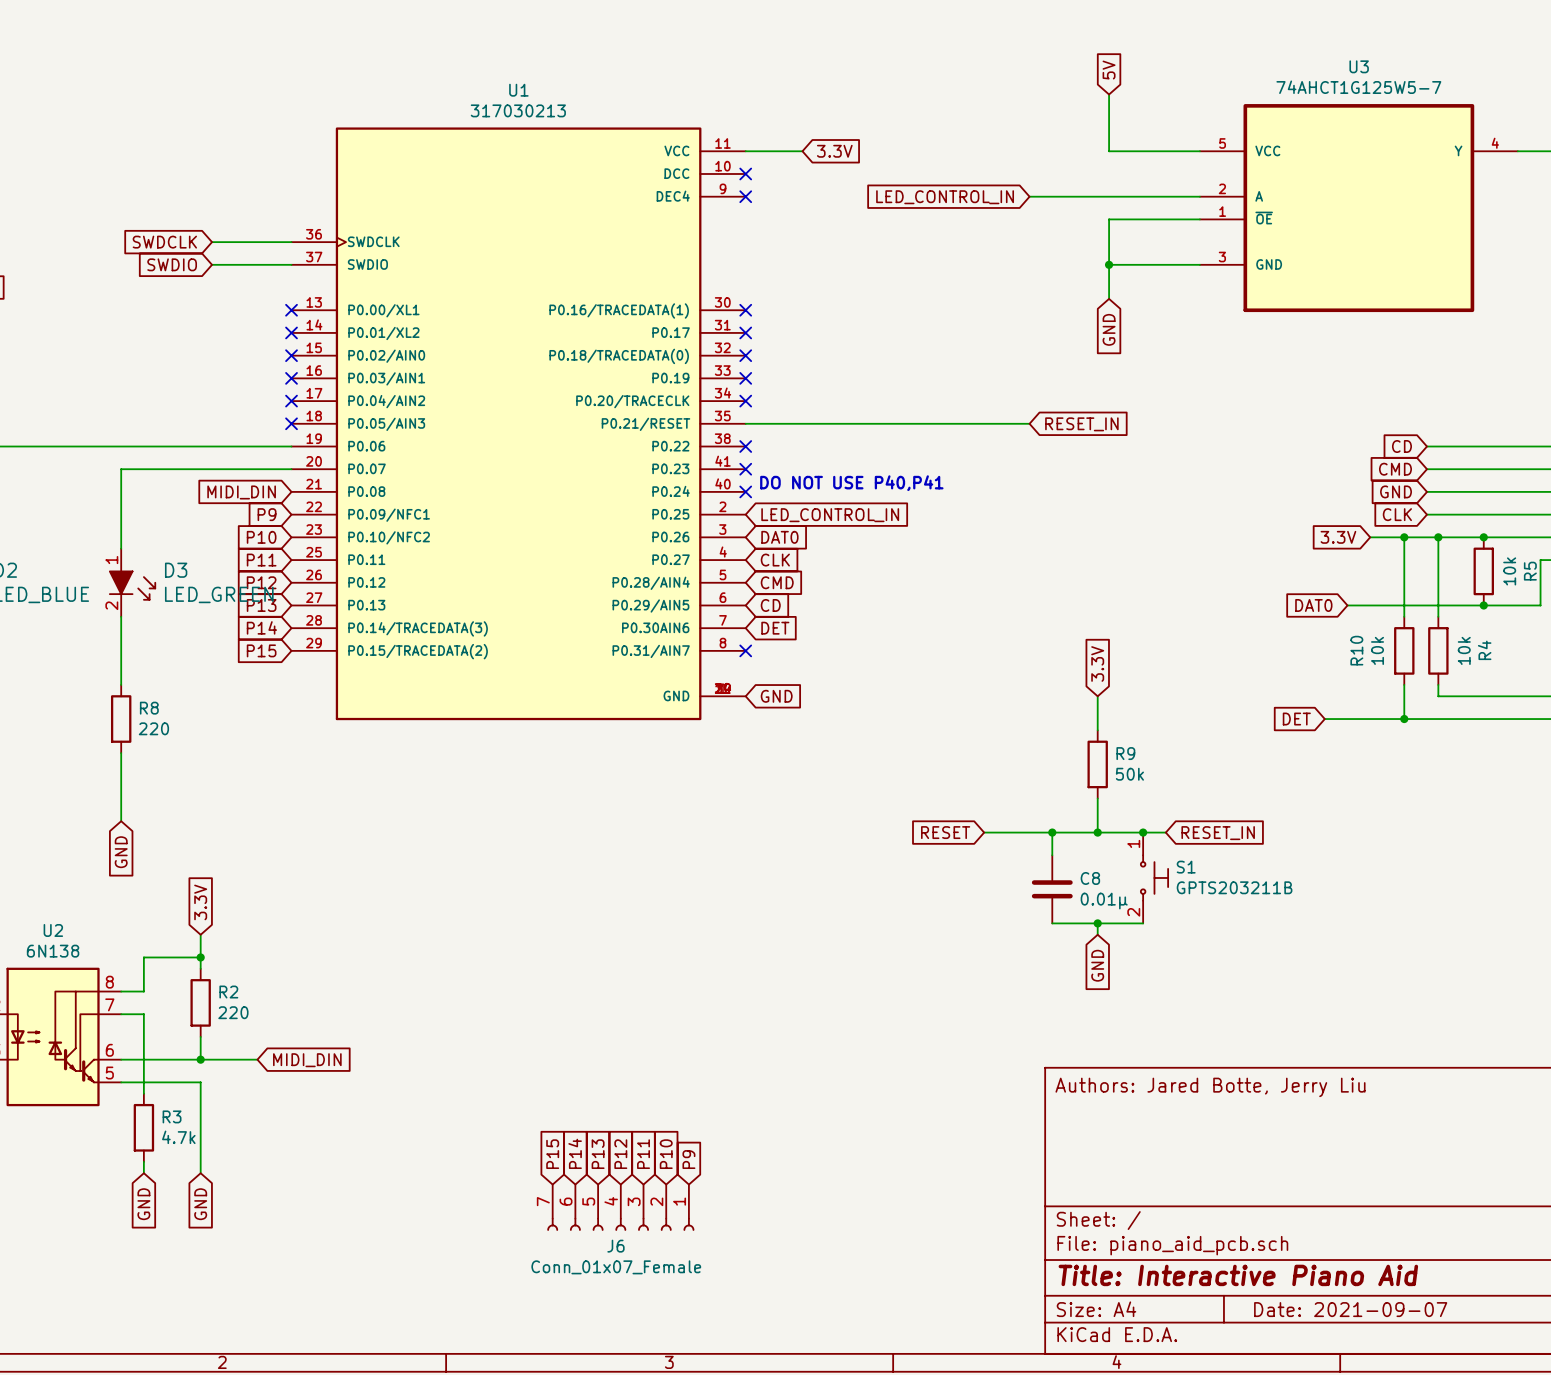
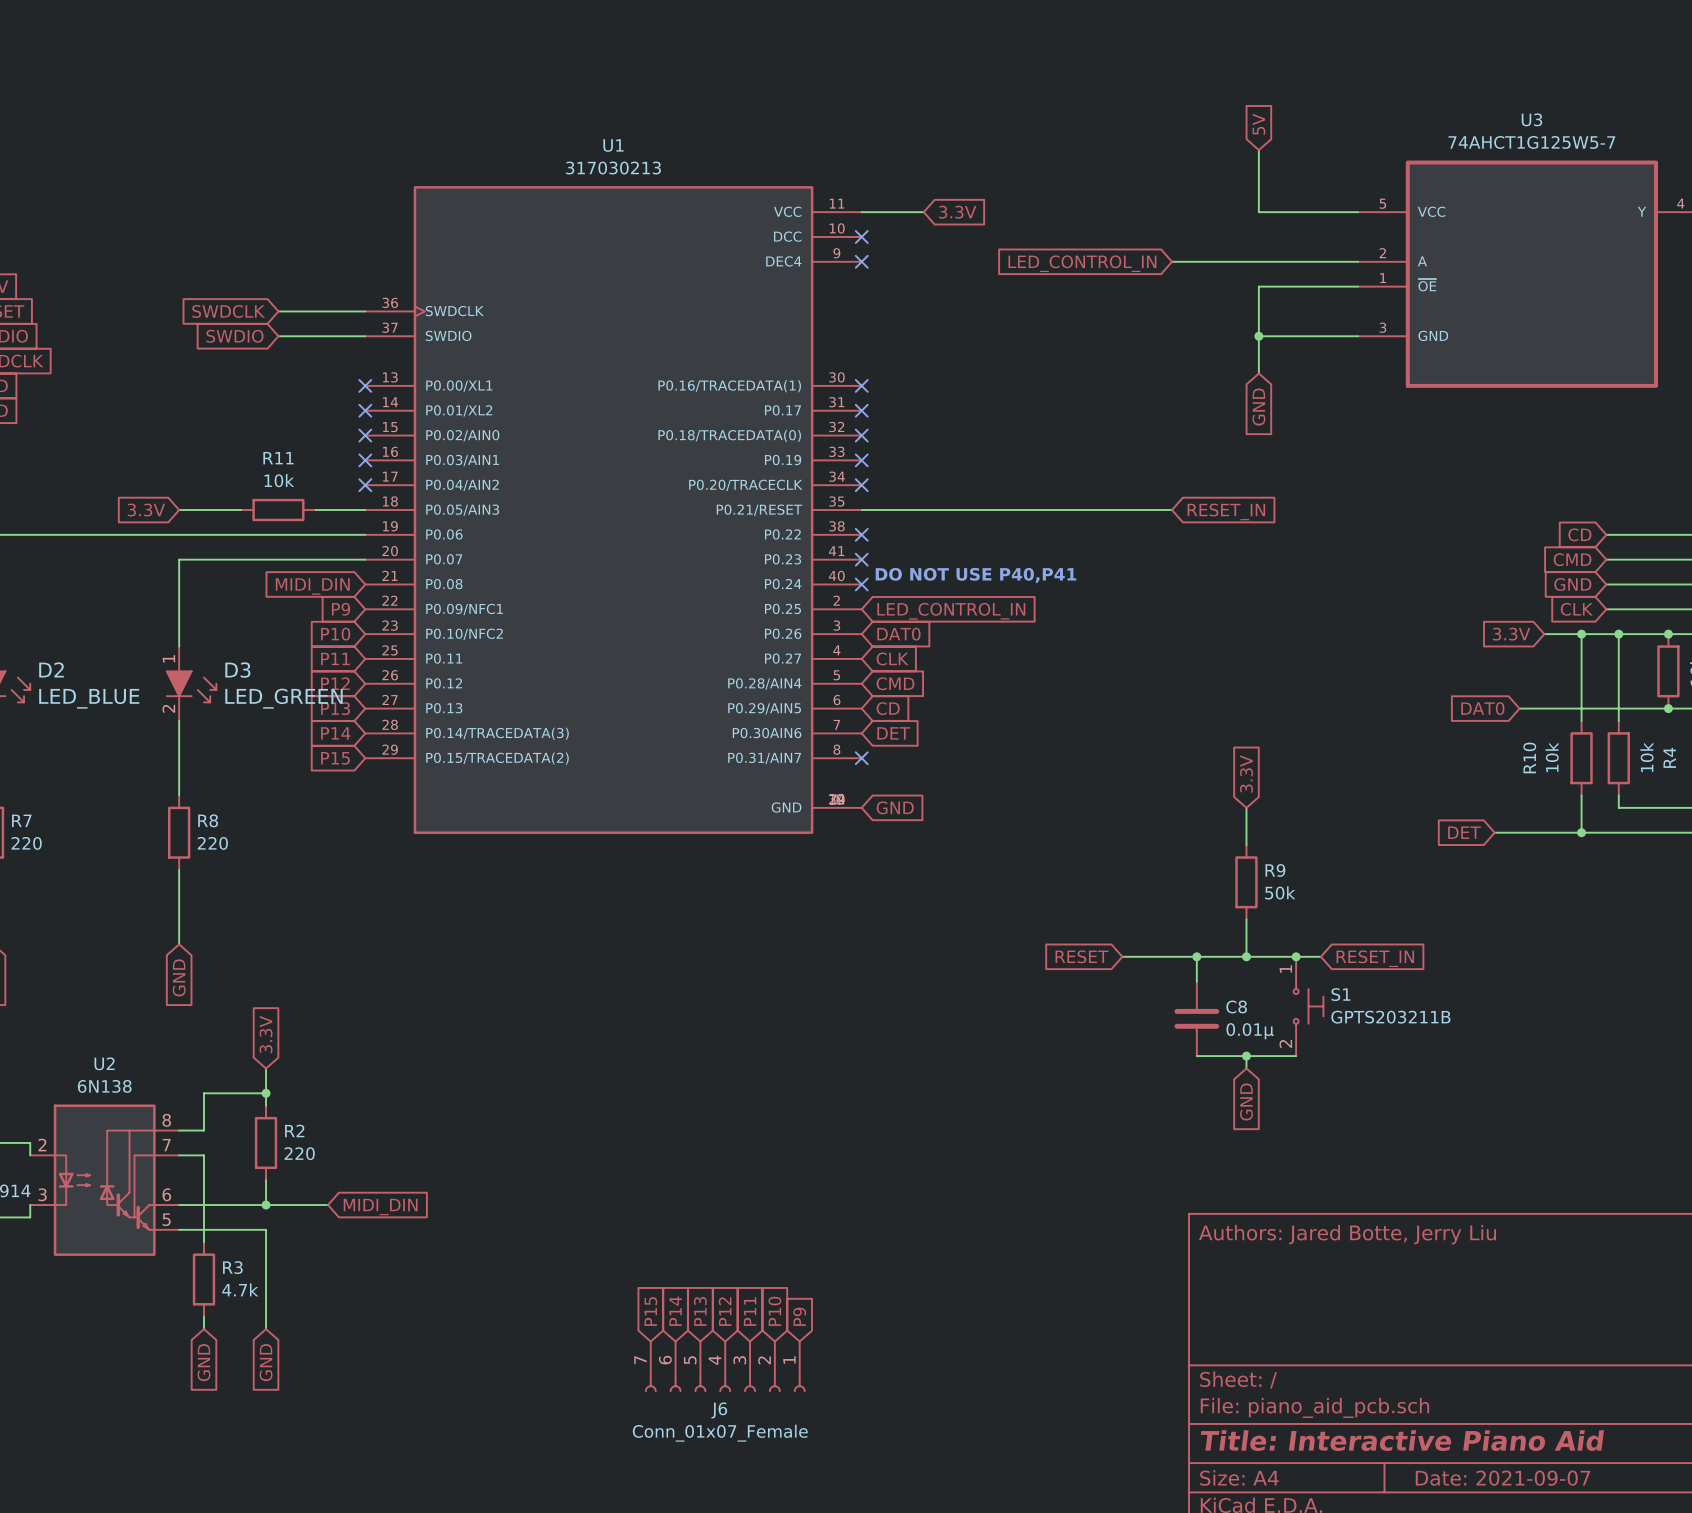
global label: none -> 3.3V (146, 510)
wire: none -> (179, 510) (241, 510)
R11: none -> 10k (278, 510)
wire: none -> (315, 510) (365, 510)
no-connect mark: (291, 423) -> none

